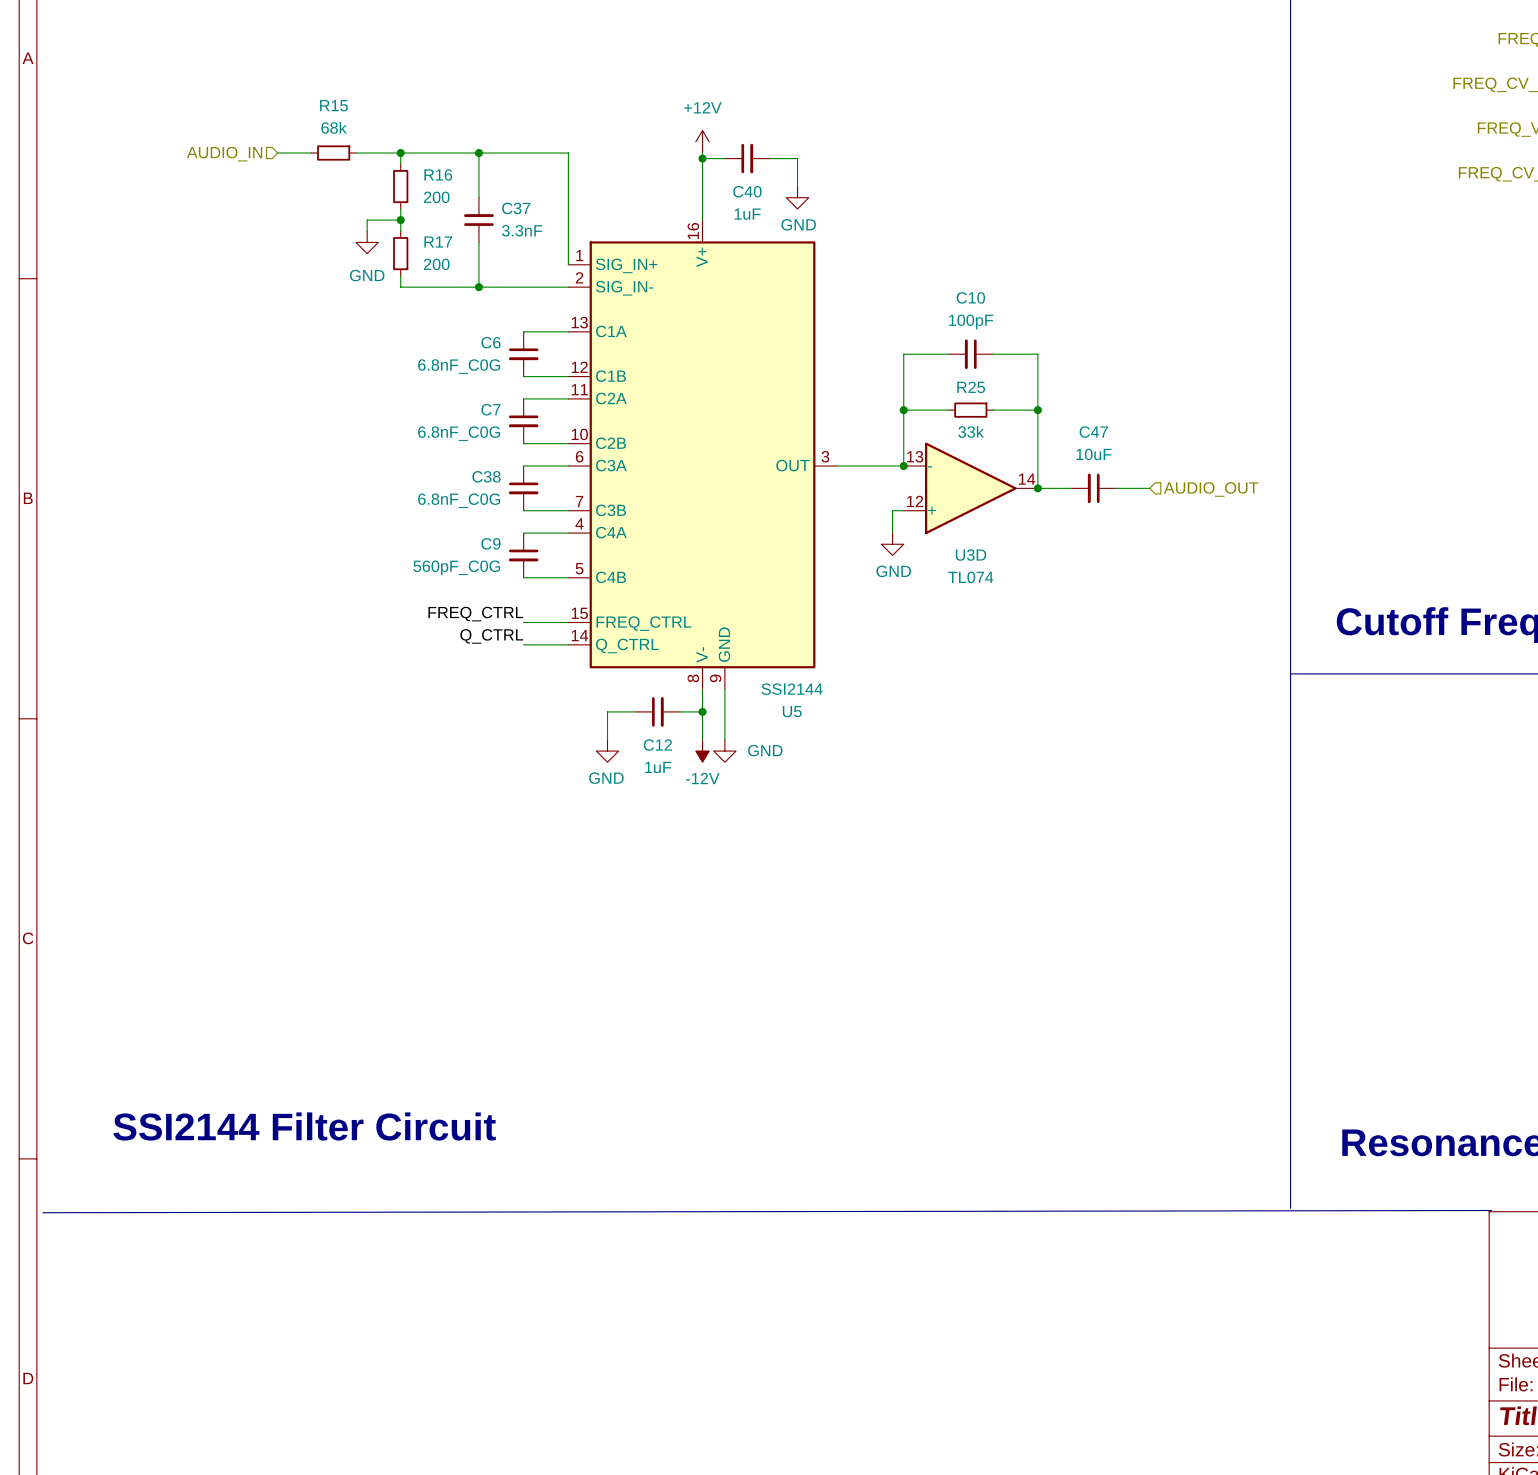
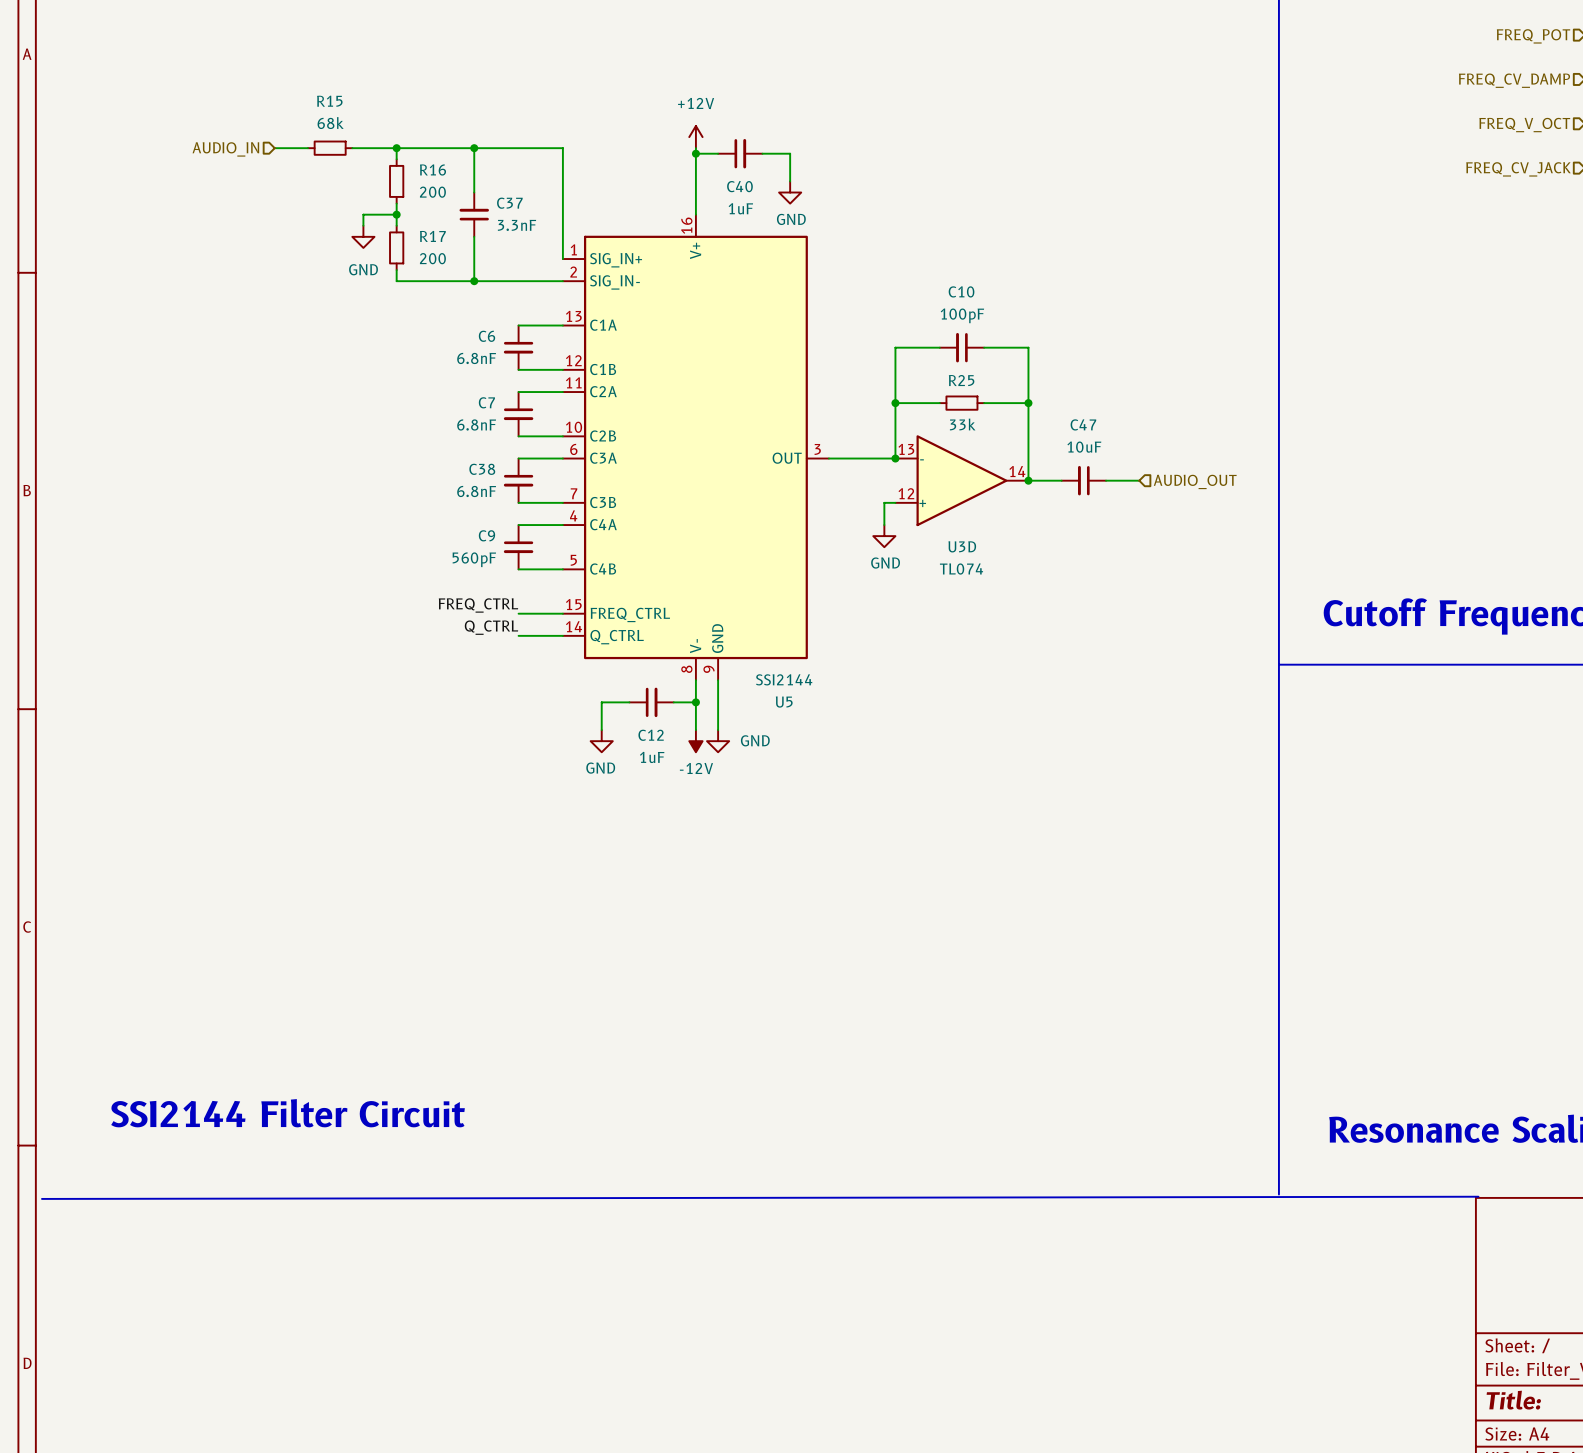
C6 value: 6.8nF_C0G (459, 366) -> 6.8nF (476, 358)
C7 value: 6.8nF_C0G (459, 433) -> 6.8nF (476, 424)
C38 value: 6.8nF_C0G (459, 500) -> 6.8nF (476, 491)
C9 value: 560pF_C0G (456, 567) -> 560pF (474, 559)

